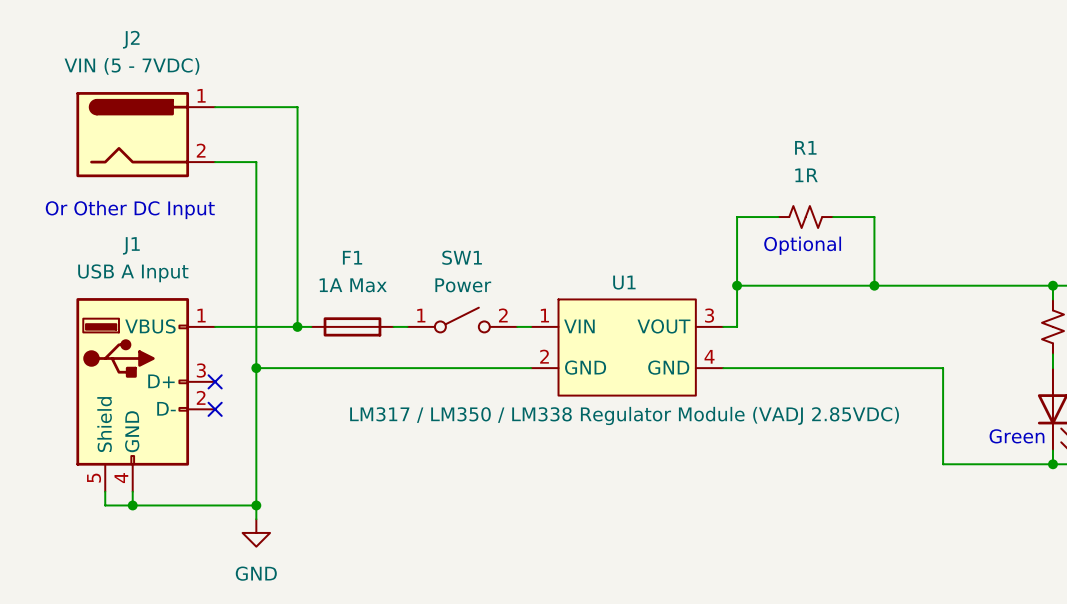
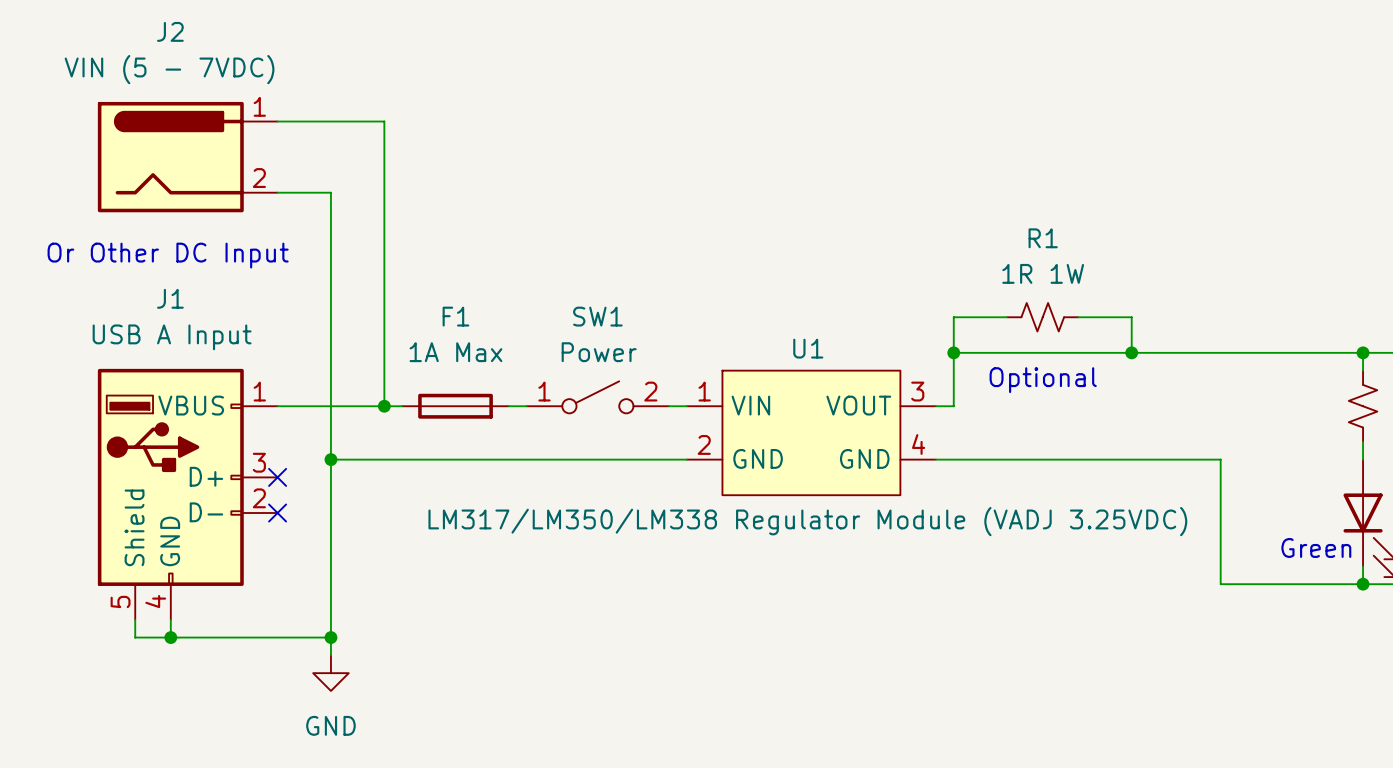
R1 name position: R1 (805, 147) -> R1 (1043, 238)
R1 value: 1R (806, 175) -> 1R 1W (1043, 273)
wire: (778, 217) (737, 217) (737, 258) -> (1007, 317) (953, 317)
R1 position: (805, 217) -> (1042, 317)
wire: (833, 217) (874, 217) (874, 258) -> (1078, 317) (1131, 317)
text position: Optional (802, 245) -> Optional (1043, 380)
U1 value: LM317 / LM350 / LM338 Regulator Module (VADJ 2.85VDC) (624, 415) -> LM317/LM350/LM338 Regulator Module (VADJ 3.25VDC) (807, 521)

